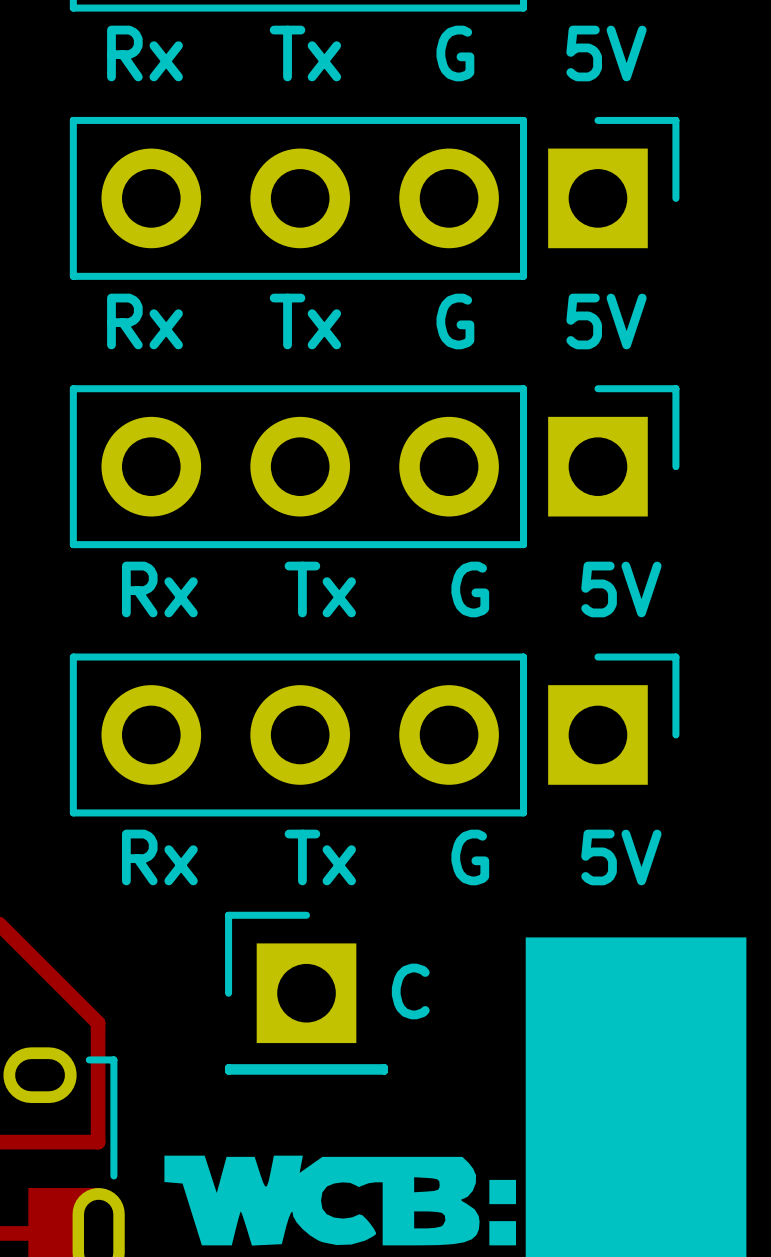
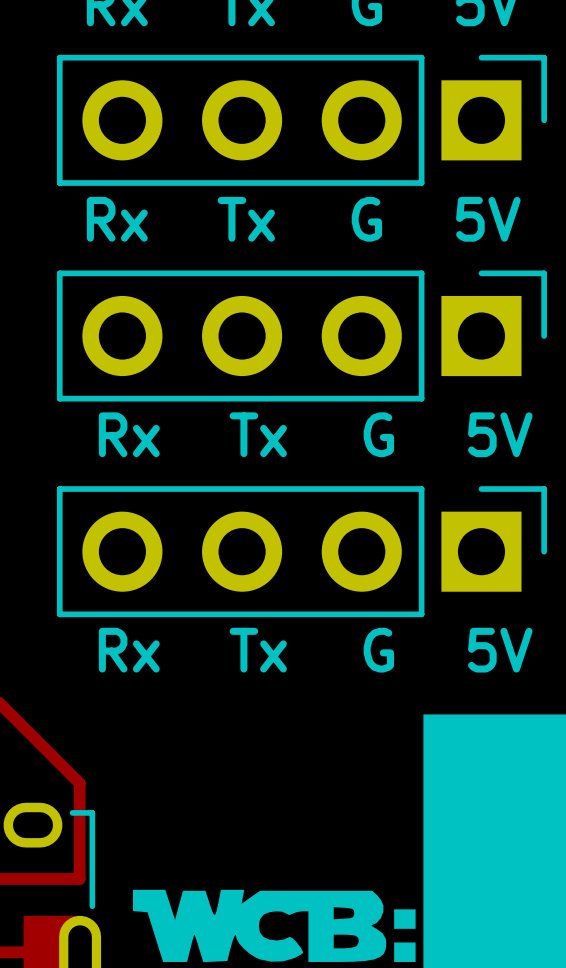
text: C (410, 991) -> none
part: (306, 993) -> none

